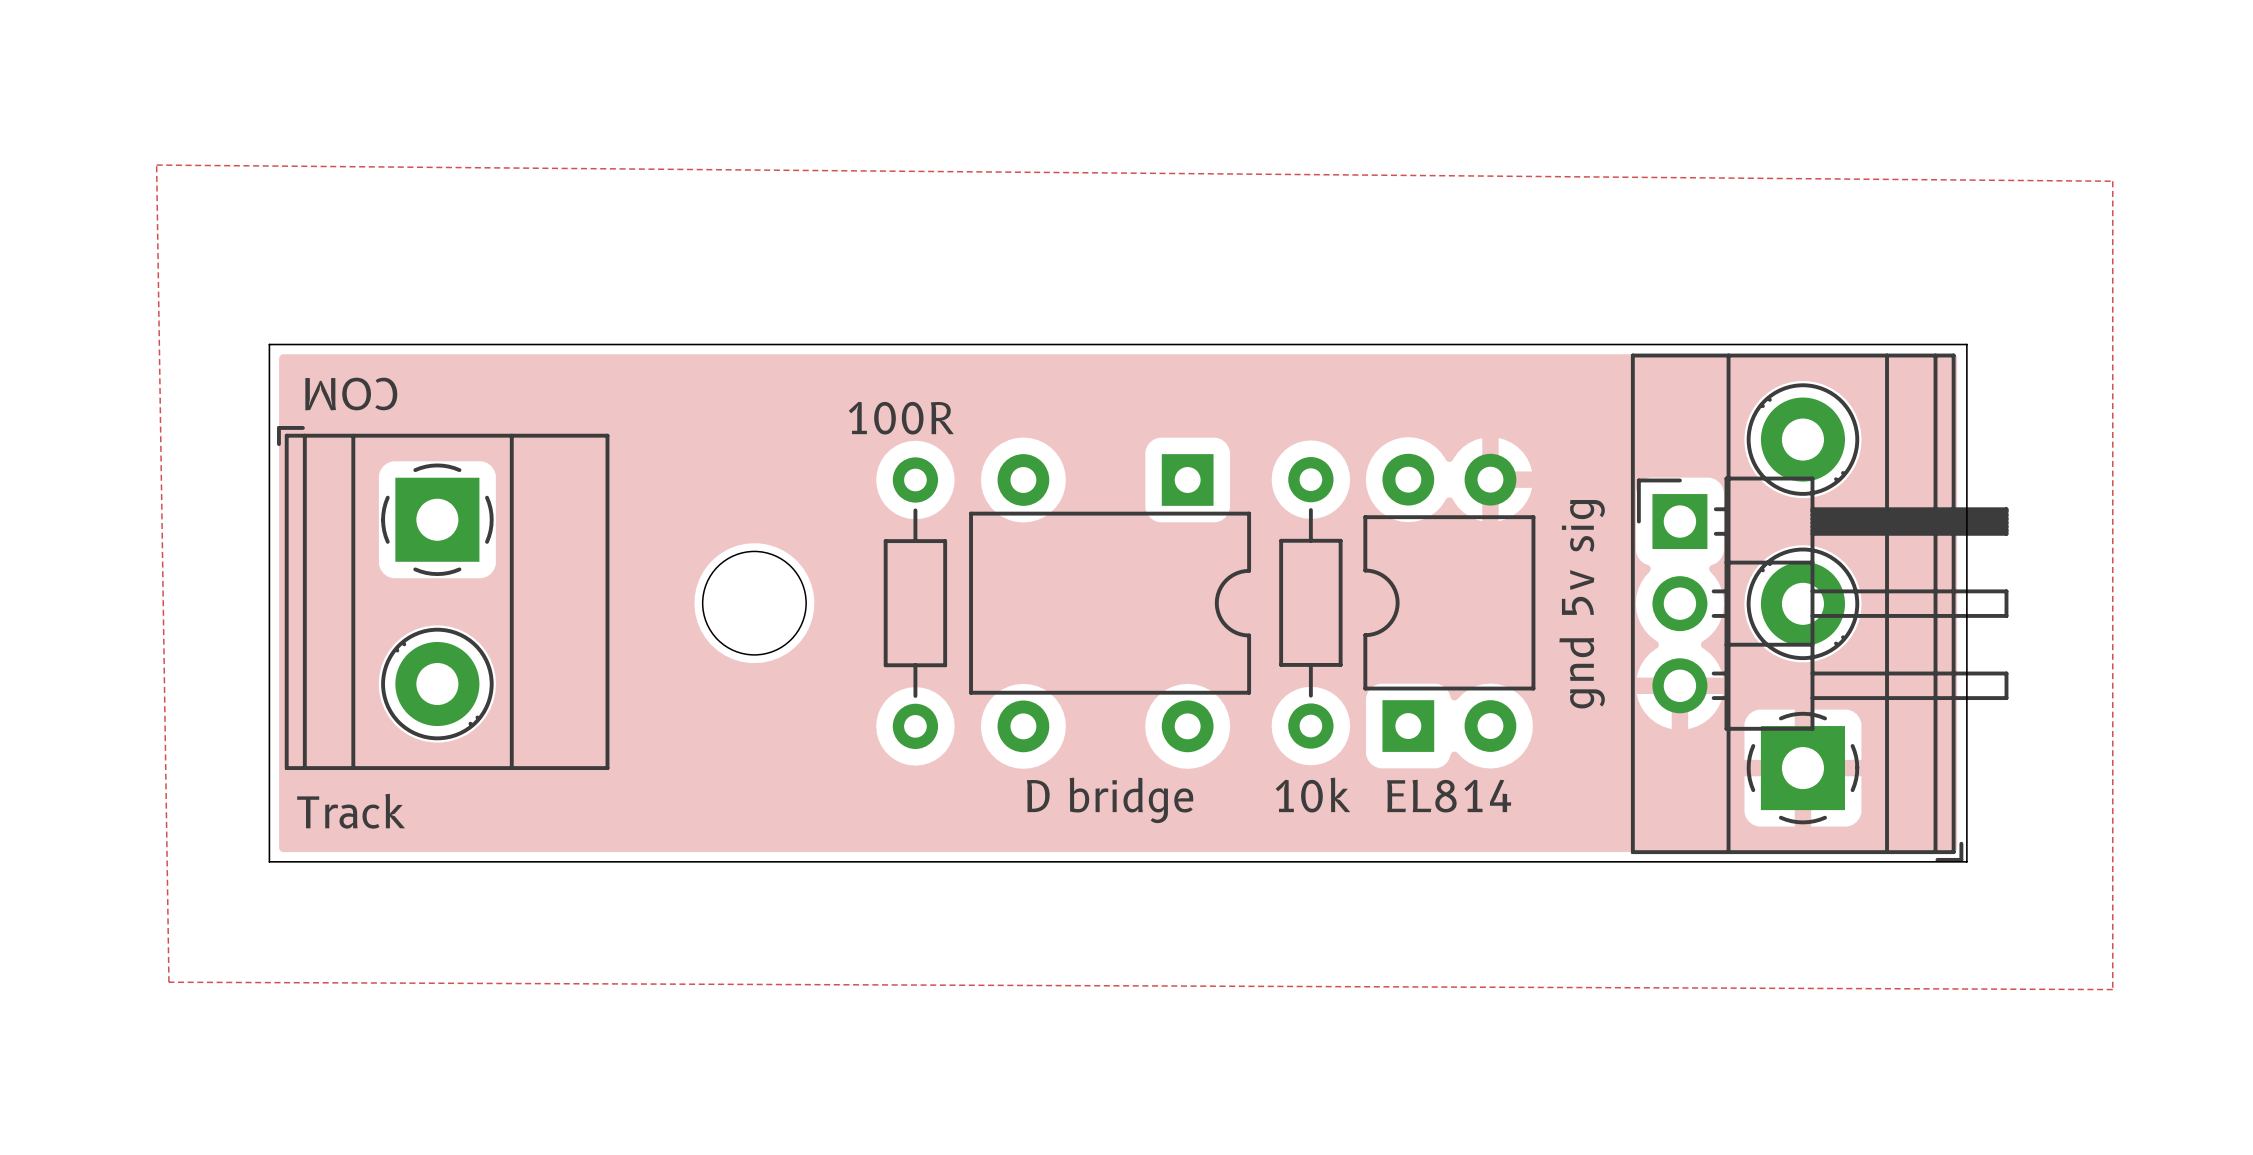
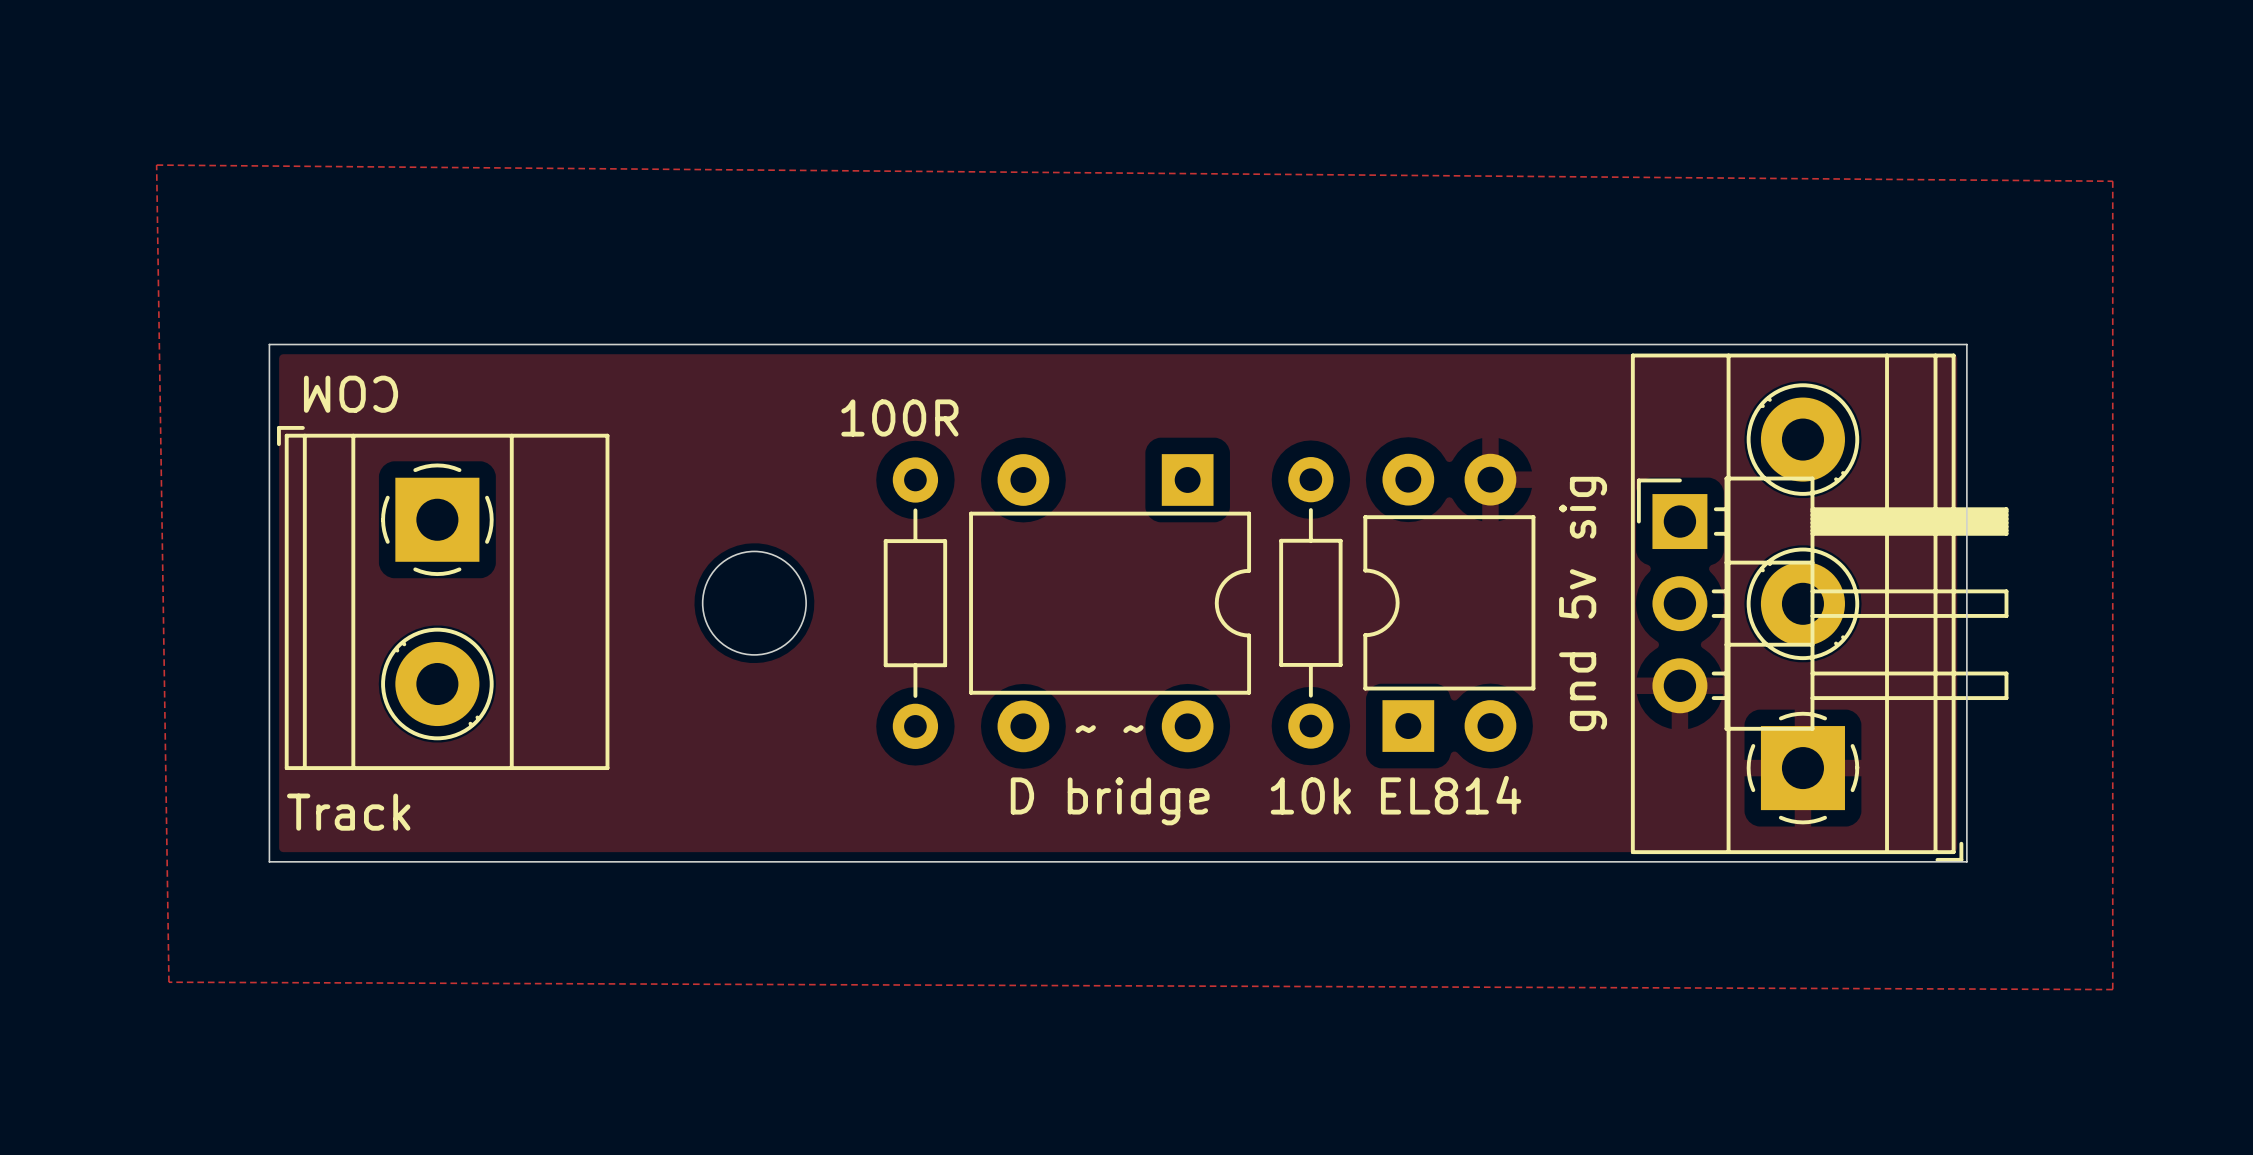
text: none -> ~ ~ (1109, 729)

